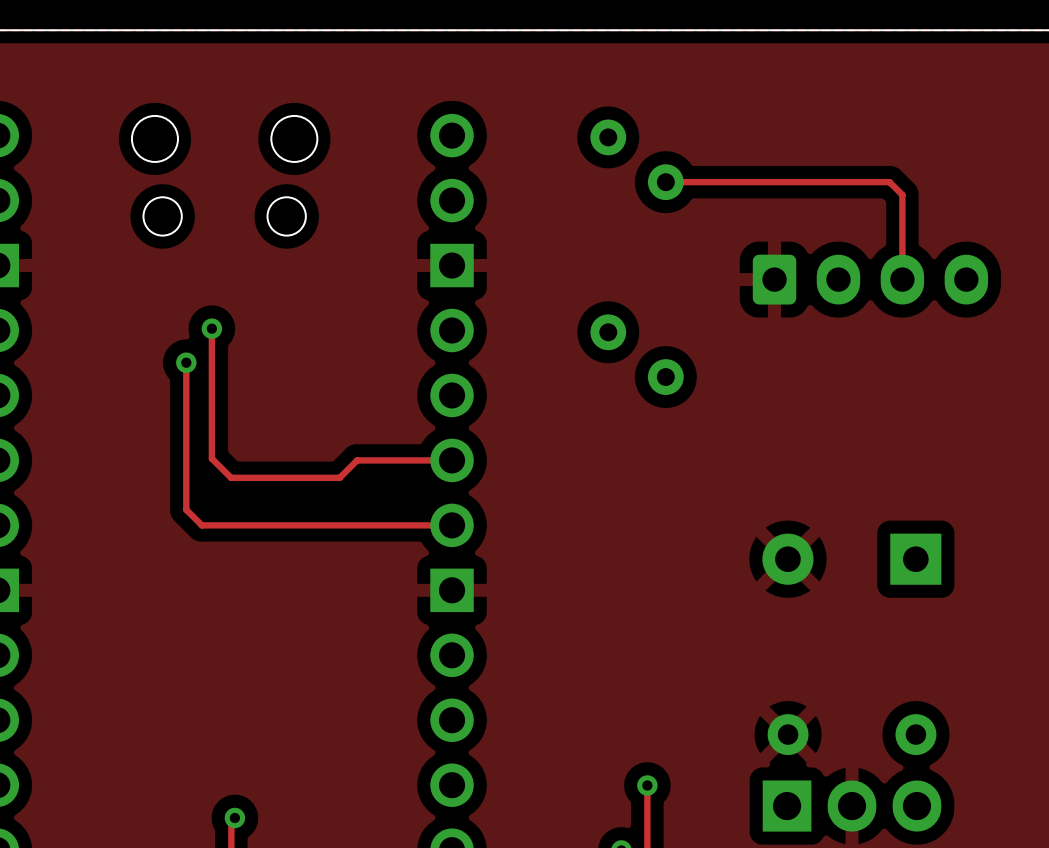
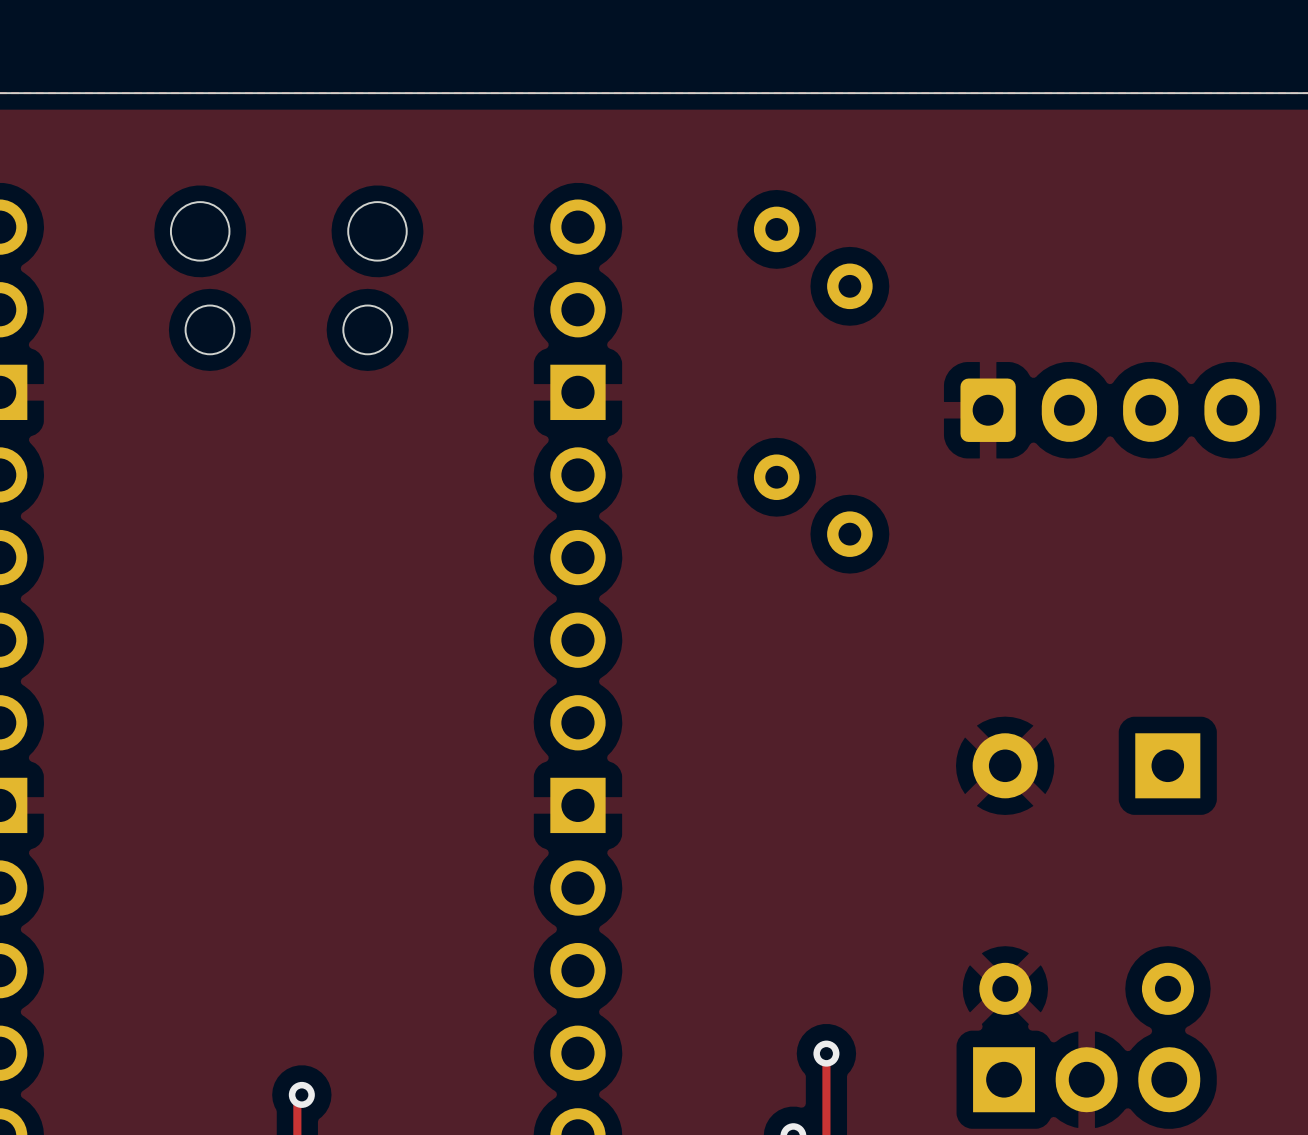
track: (665, 182) (889, 182) (902, 194) (902, 279) -> none
track: (211, 328) (211, 458) (231, 477) (339, 477) (357, 460) (452, 460) -> none
via: (211, 328) -> none
track: (186, 362) (186, 509) (201, 525) (452, 525) -> none
via: (186, 362) -> none

